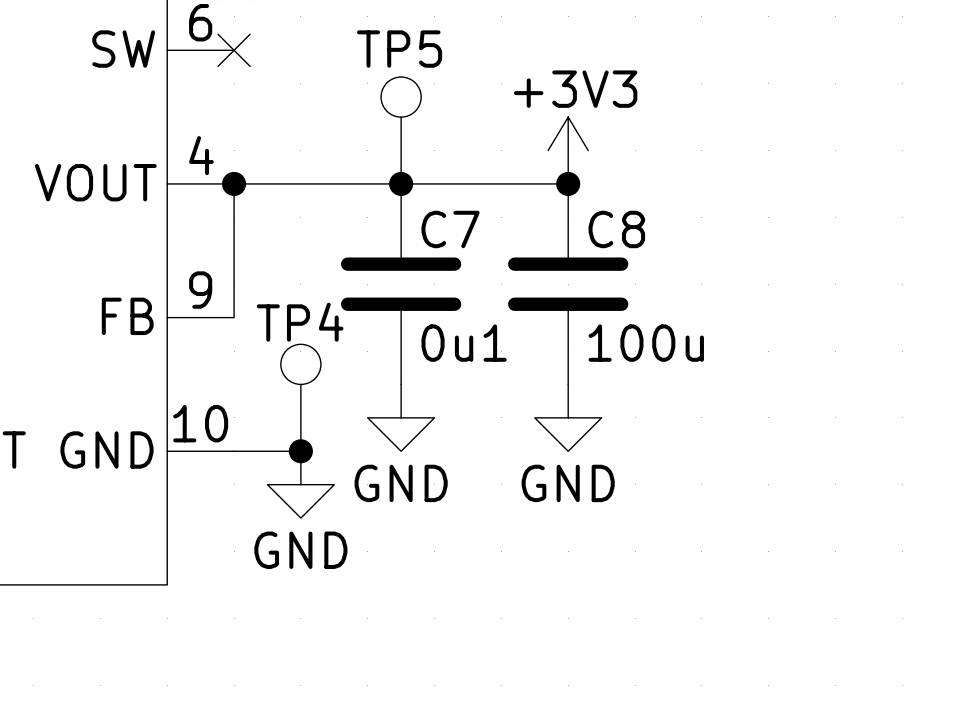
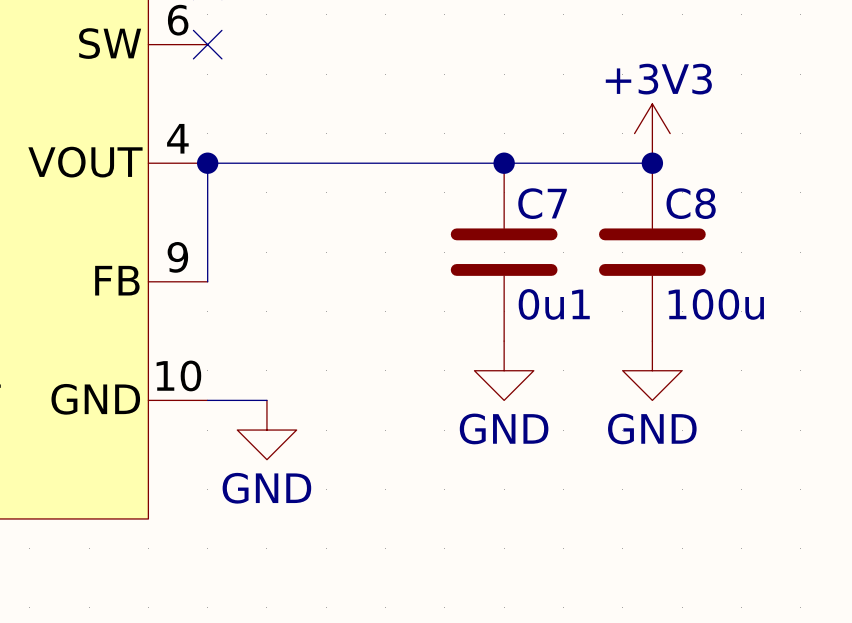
TP5: (401, 130) -> none
power symbol position: +3V3 (568, 150) -> +3V3 (652, 133)
junction: (401, 183) -> none
wire: none -> (504, 163) (652, 163)
junction: none -> (652, 163)
C8 name: C8 (616, 229) -> C7 (542, 203)
C7: 0u1 (401, 284) -> none
C8: none -> 100u (652, 252)
C8 value: 100u (646, 343) -> 0u1 (554, 304)
TP4: (300, 397) -> none
power symbol position: GND (401, 417) -> GND (652, 370)
junction: (300, 451) -> none

